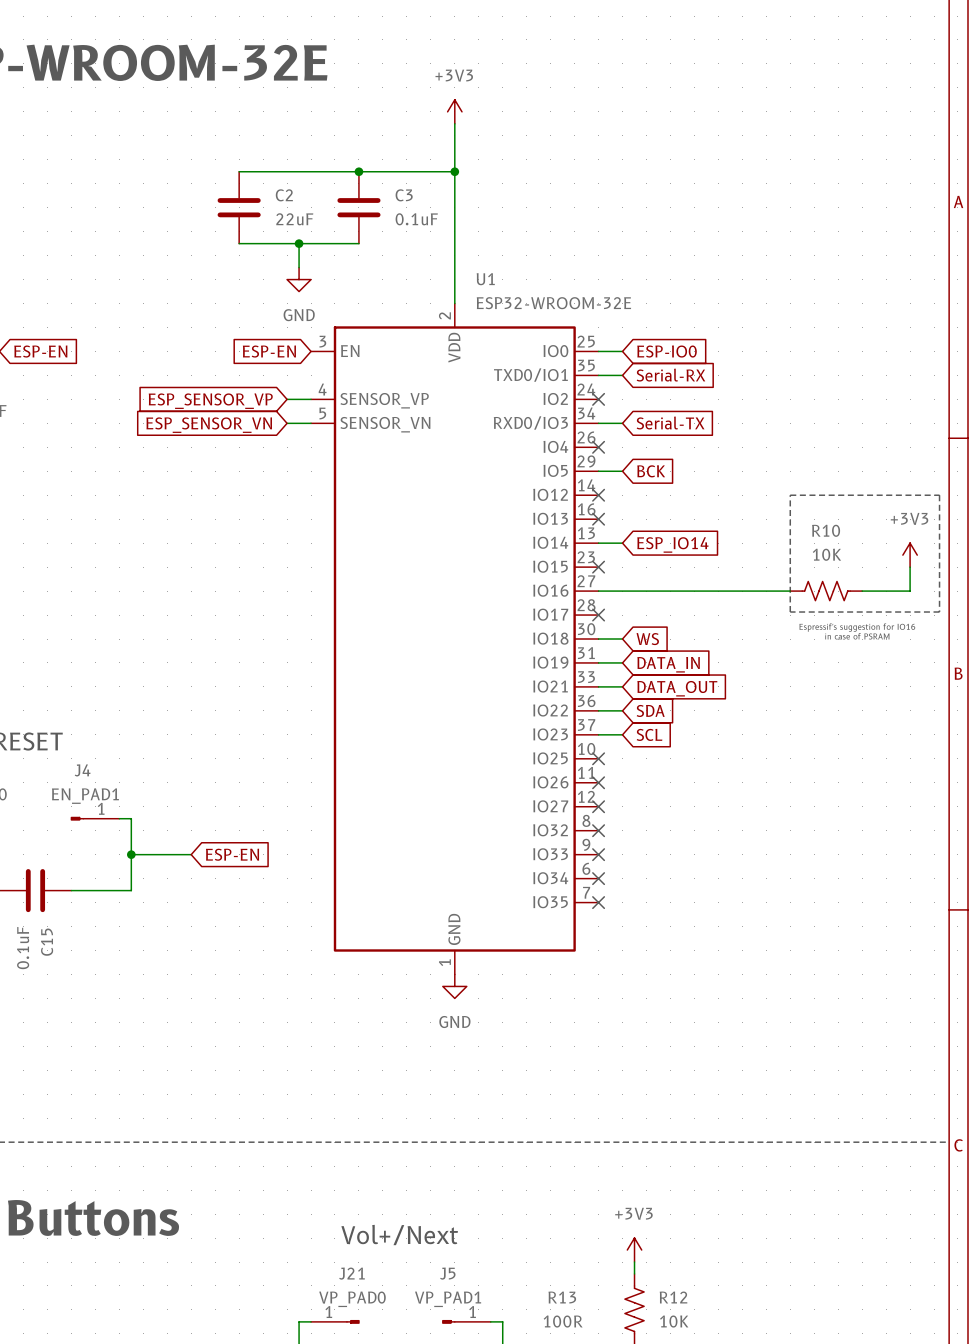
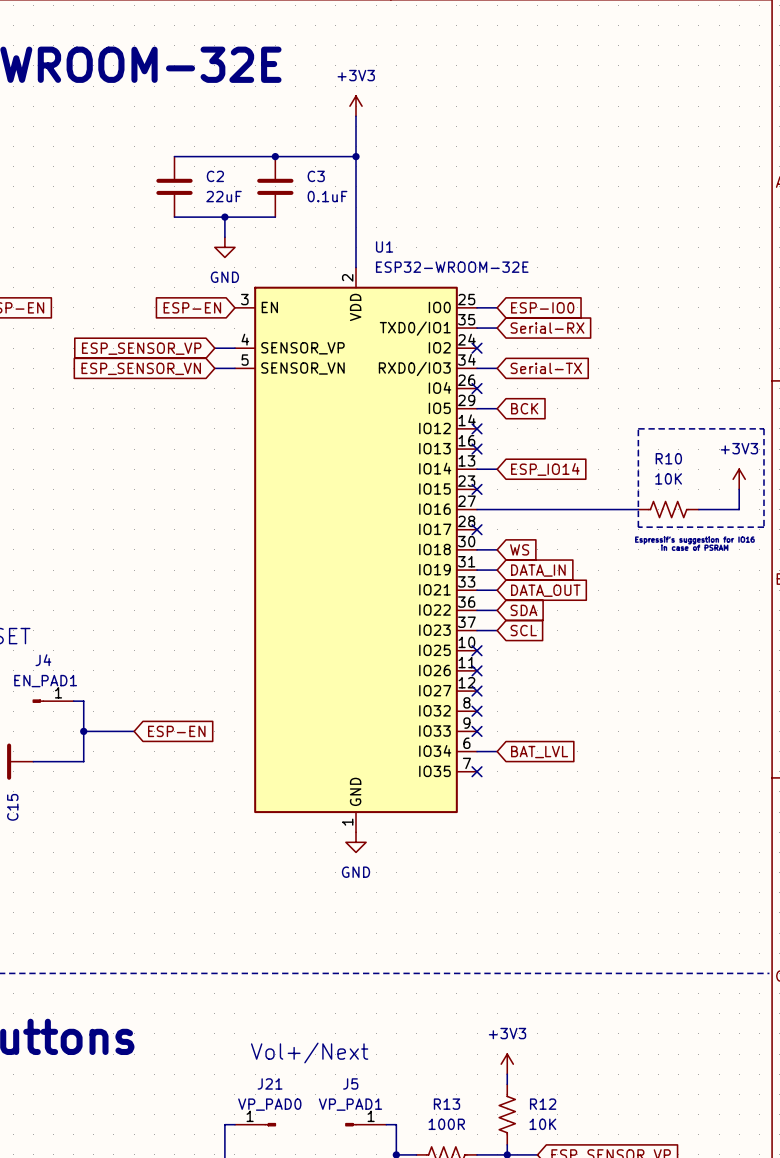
wire: none -> (477, 751) (497, 751)
no-connect mark: (598, 878) -> none
global label: none -> BAT_LVL (539, 752)

